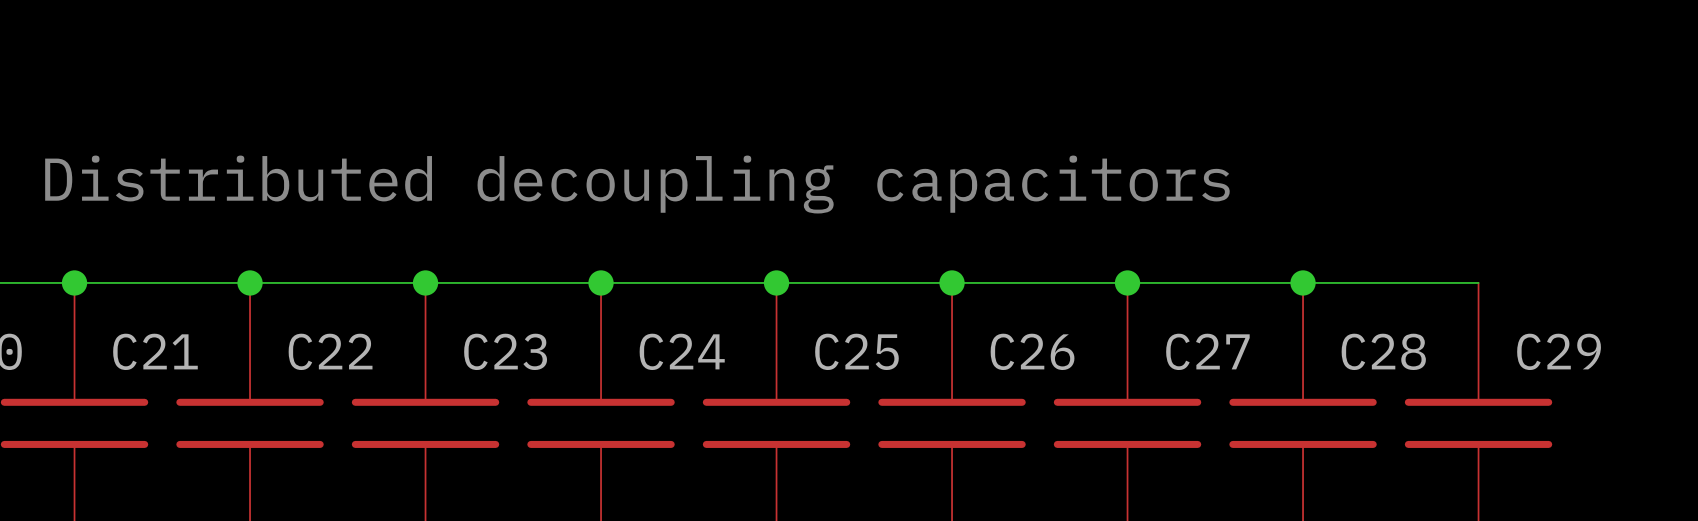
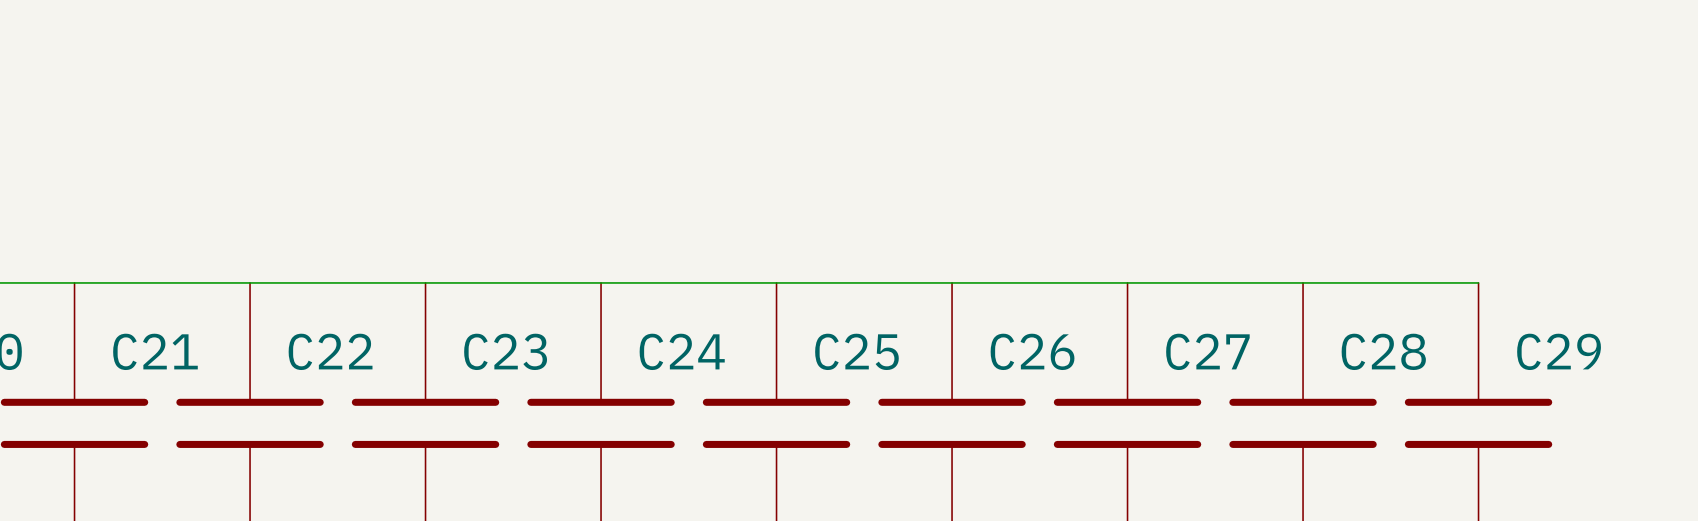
text: Distributed decoupling capacitors (637, 184) -> none
junction: (74, 282) -> none
junction: (250, 282) -> none
junction: (425, 282) -> none
junction: (601, 282) -> none
junction: (776, 282) -> none
junction: (952, 282) -> none
junction: (1127, 282) -> none
junction: (1303, 282) -> none

